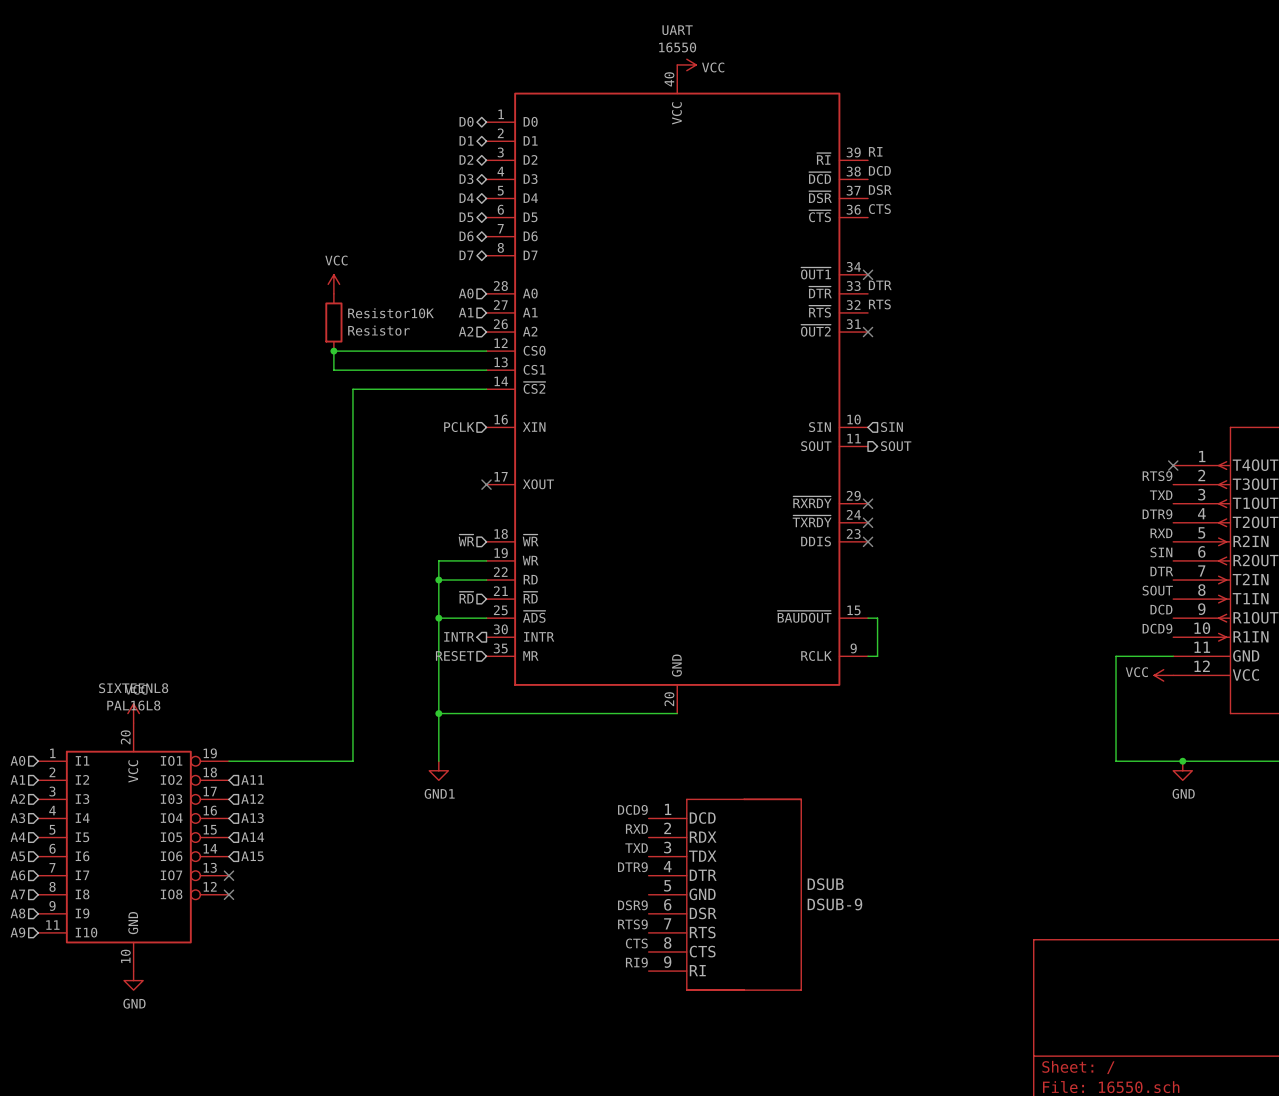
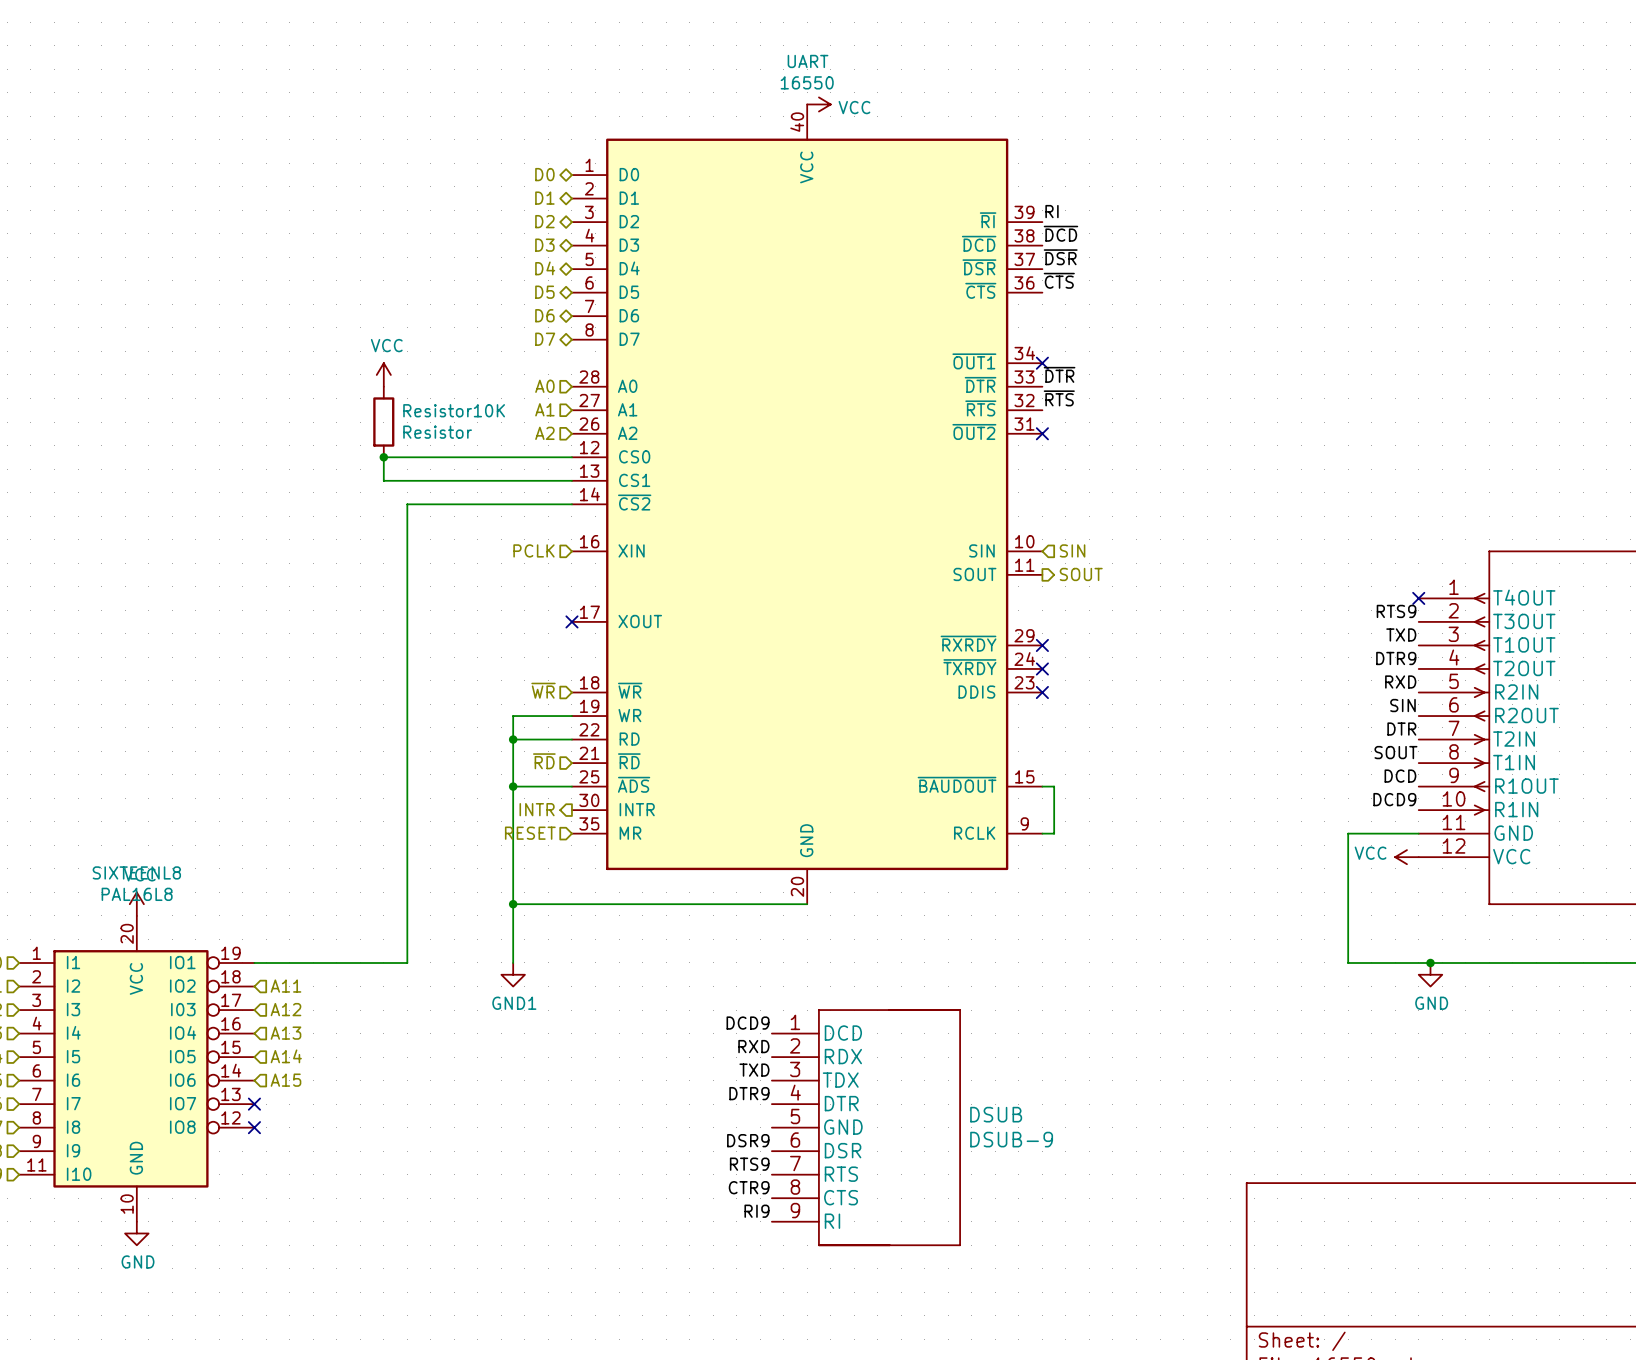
label: DCD (879, 170) -> ~{DCD} (1060, 233)
label: DSR (880, 189) -> ~{DSR} (1060, 257)
label: CTS (879, 209) -> ~{CTS} (1059, 280)
label: DTR (880, 285) -> ~{DTR} (1059, 374)
label: RTS (879, 304) -> ~{RTS} (1059, 398)
label: CTS (636, 943) -> CTR9 (749, 1187)

